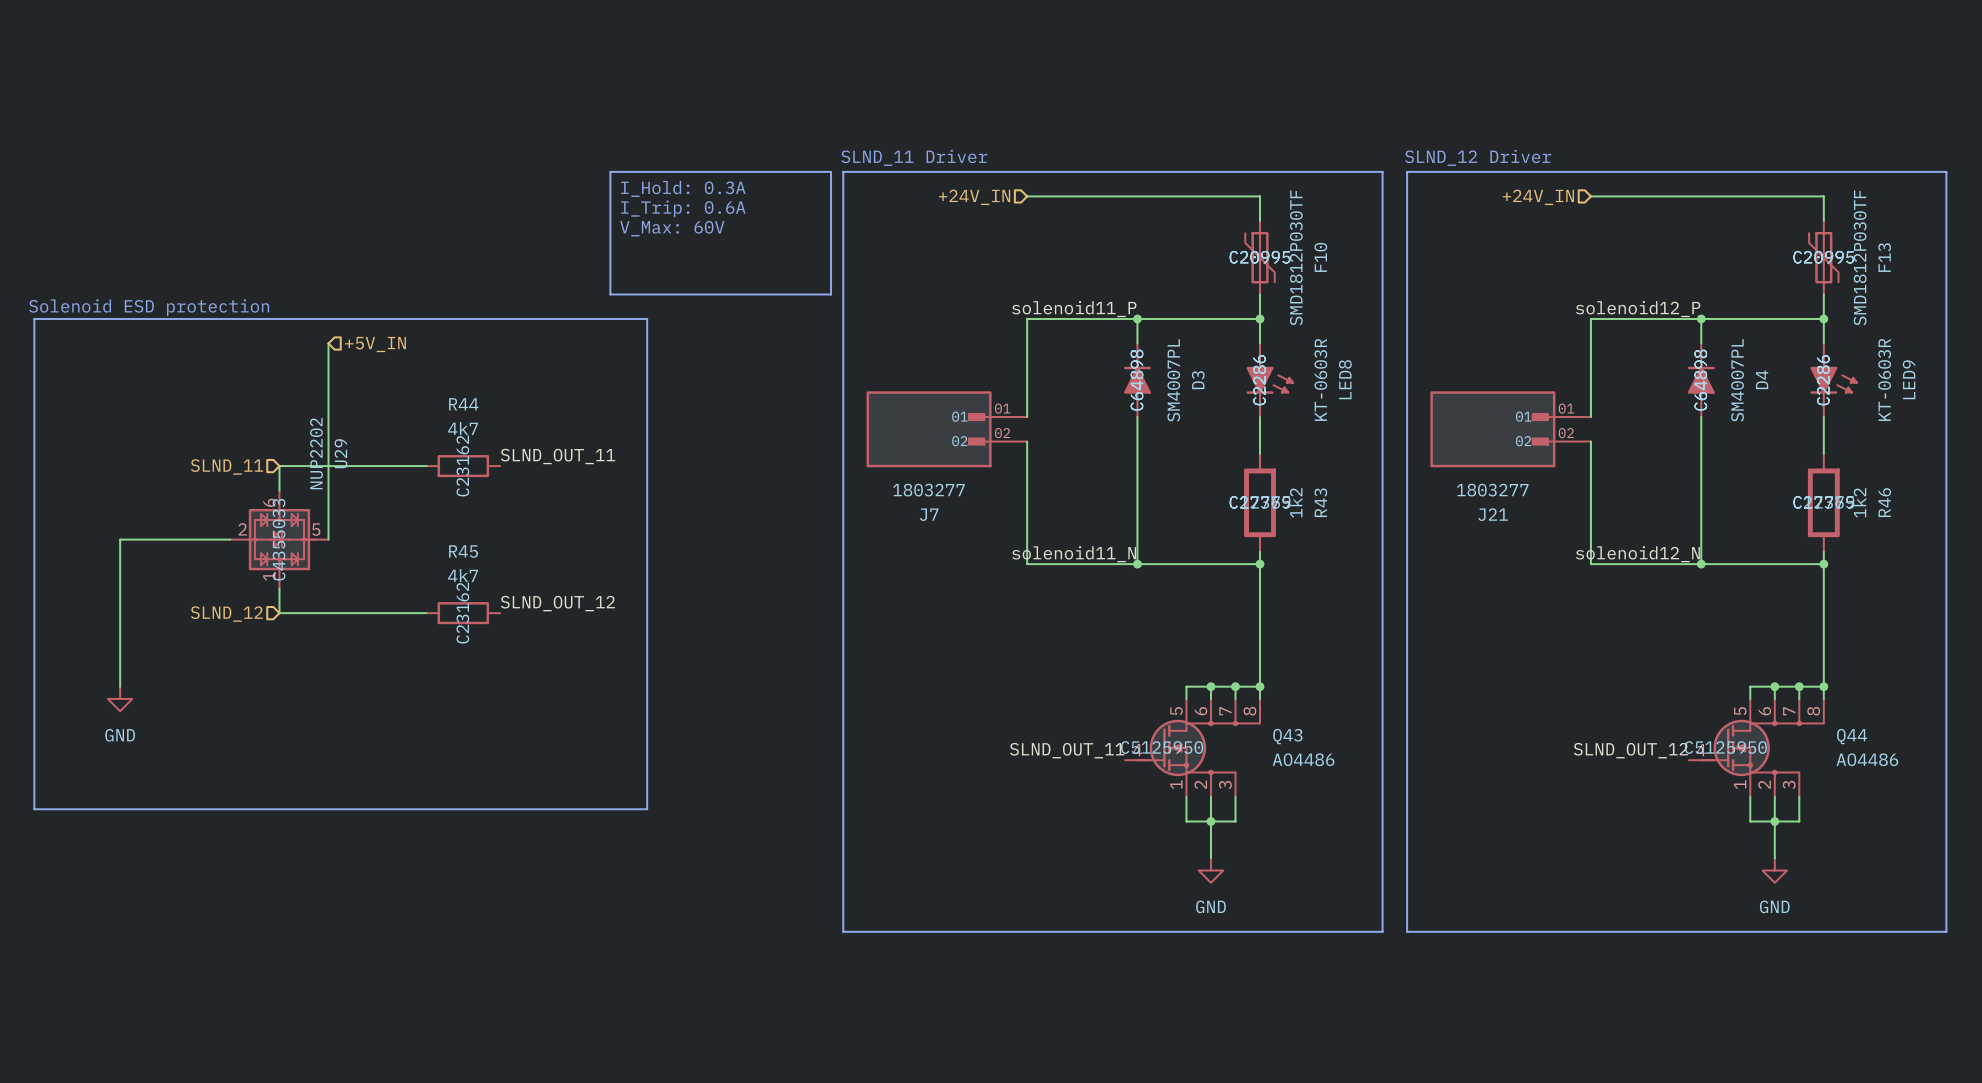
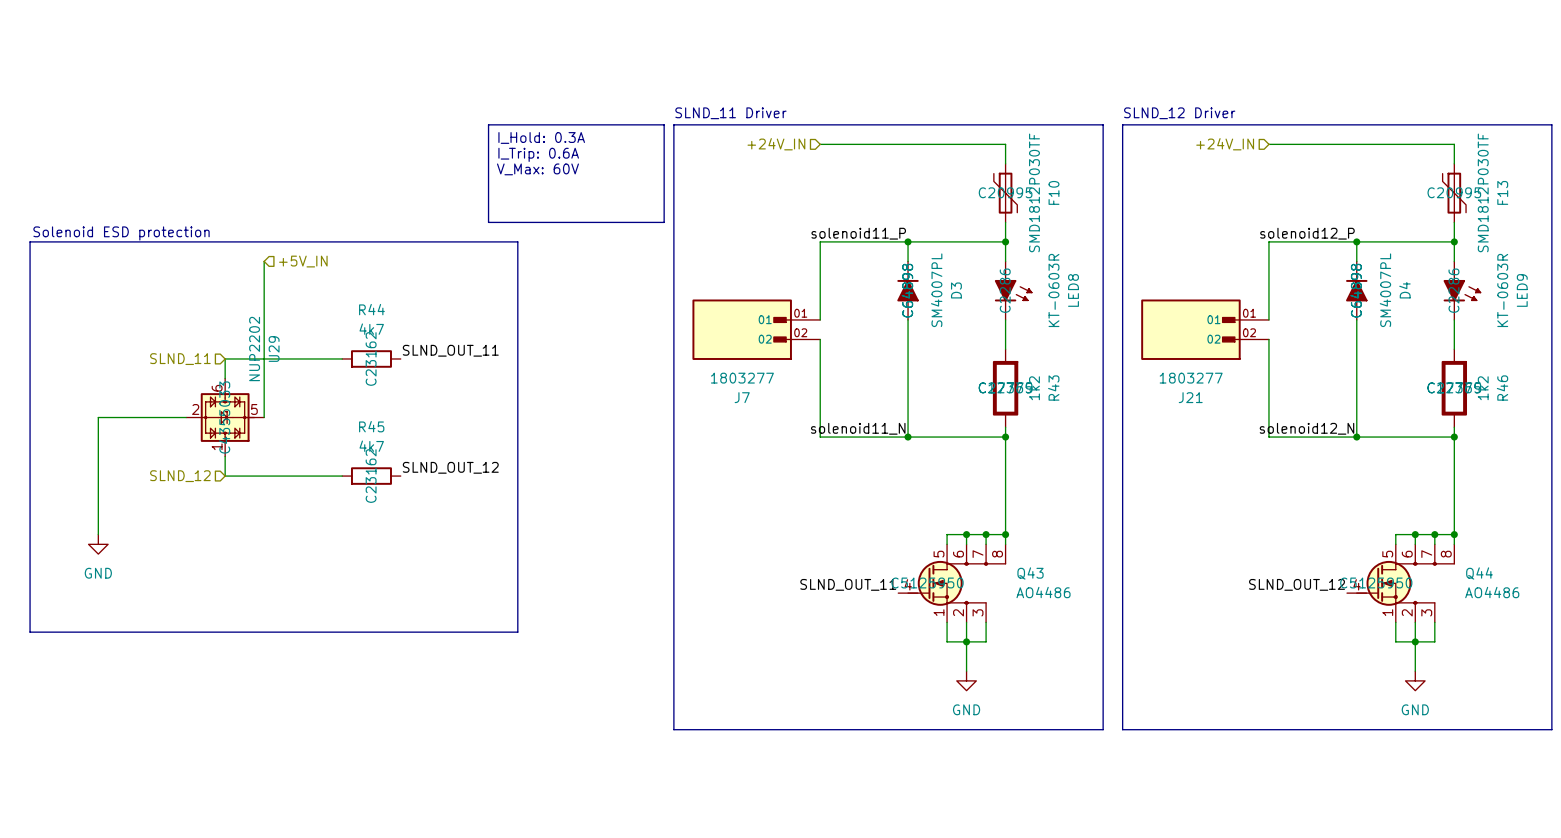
F10 text: C20995 (1260, 257) -> none
F13 text: C20995 (1823, 257) -> none
LED8 text: C2286 (1259, 380) -> none
LED9 text: C2286 (1823, 380) -> none

